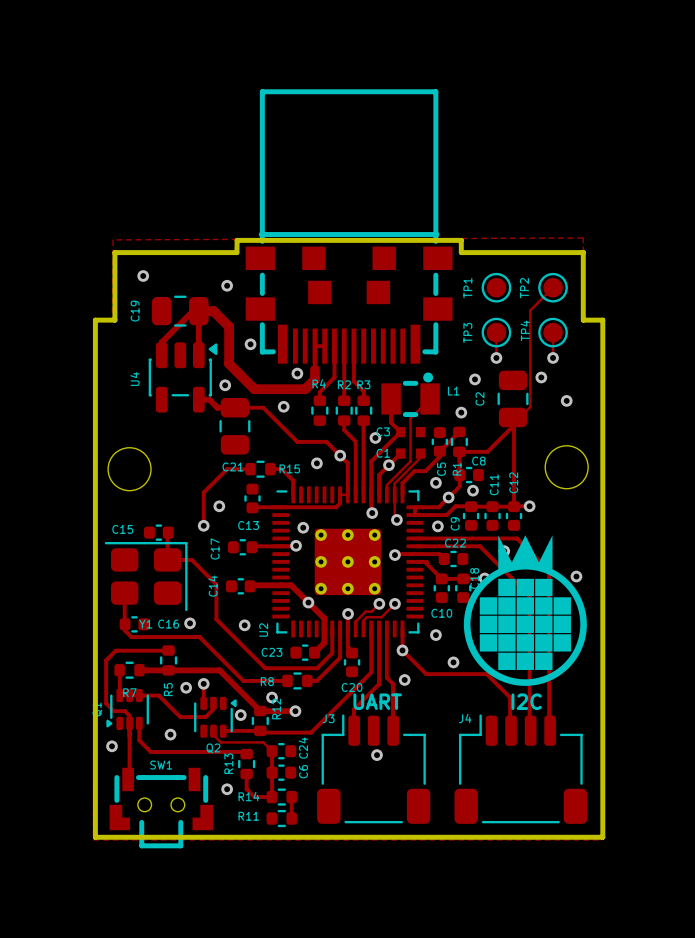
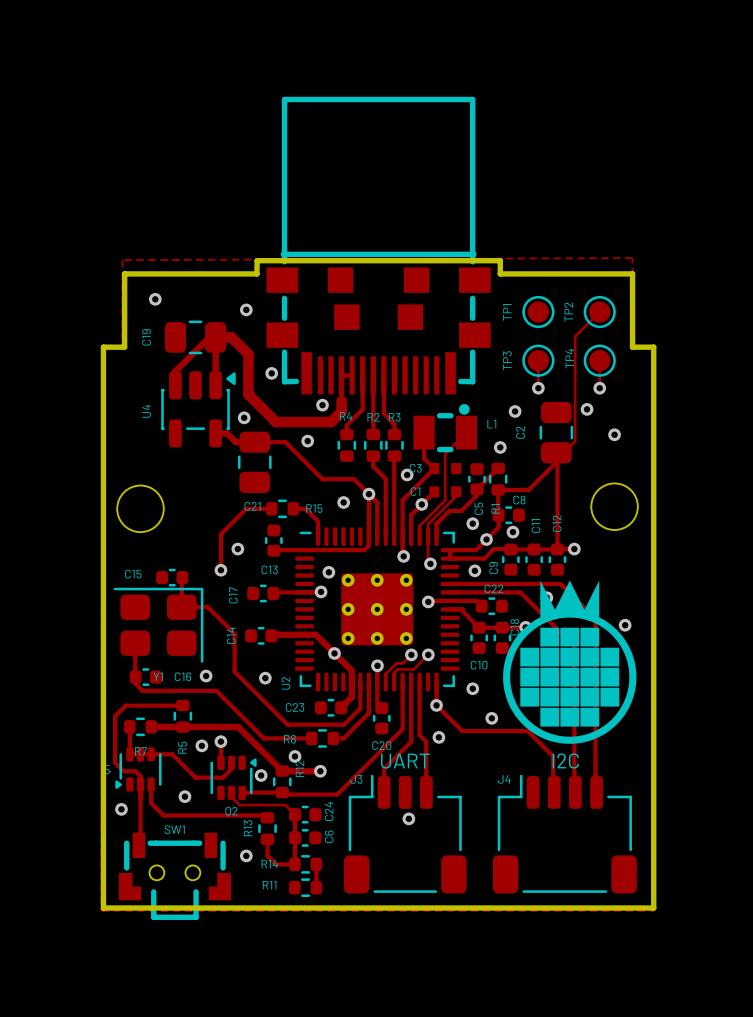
track: (340, 494) (347, 494) -> (368, 536) (368, 494)

